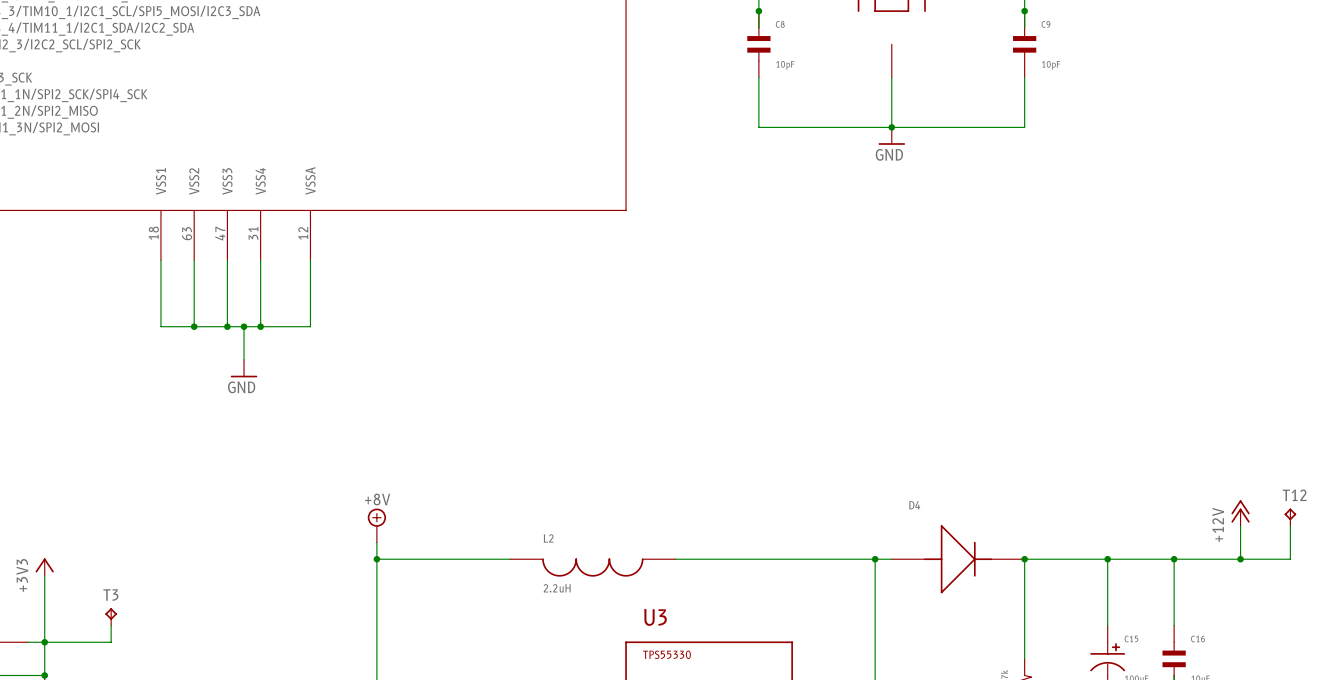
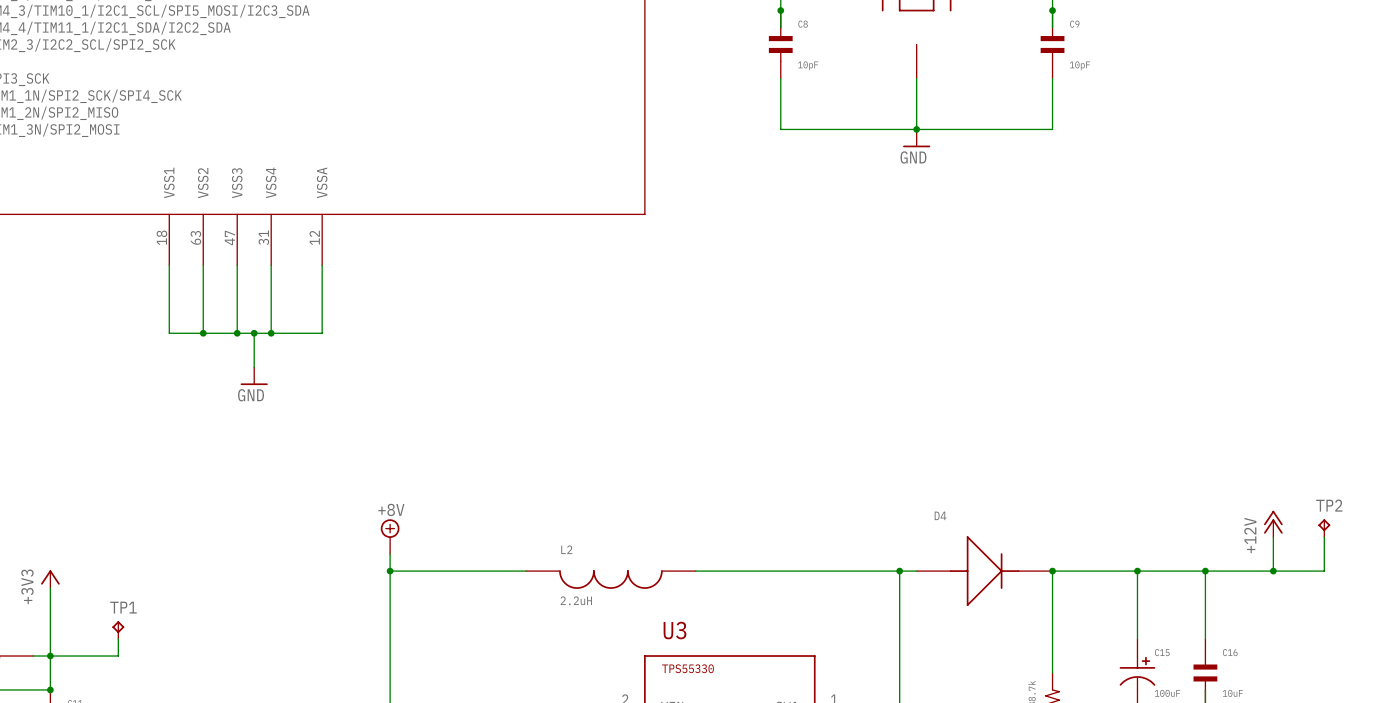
T12 name: T12 (1294, 495) -> TP2 (1329, 505)
T3 name: T3 (110, 595) -> TP1 (123, 607)

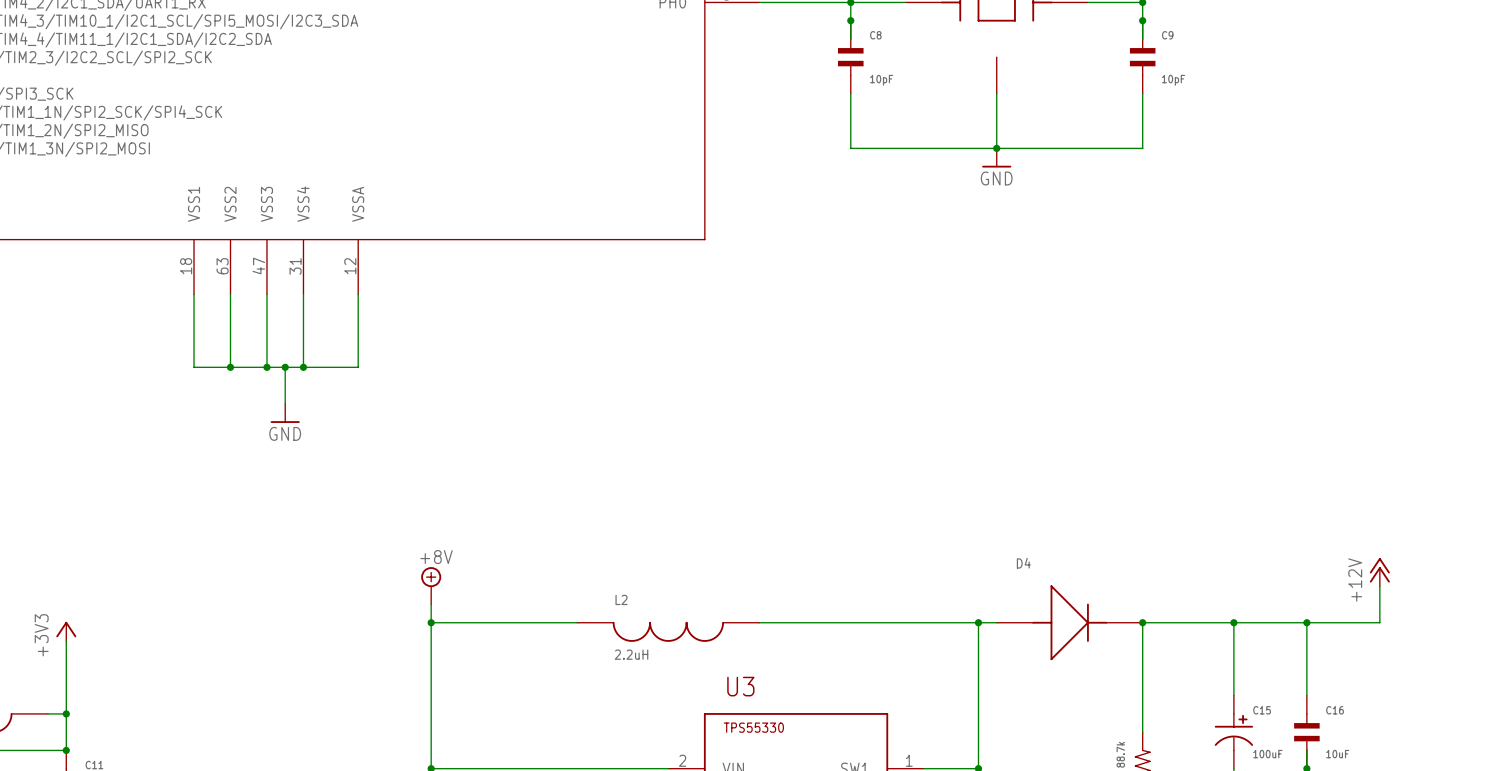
TP2: (1324, 528) -> none
wire: (1324, 537) (1324, 571) (1273, 571) -> none
junction: (1273, 571) -> none
TP1: (118, 630) -> none
wire: (118, 639) (118, 656) (50, 656) -> none

